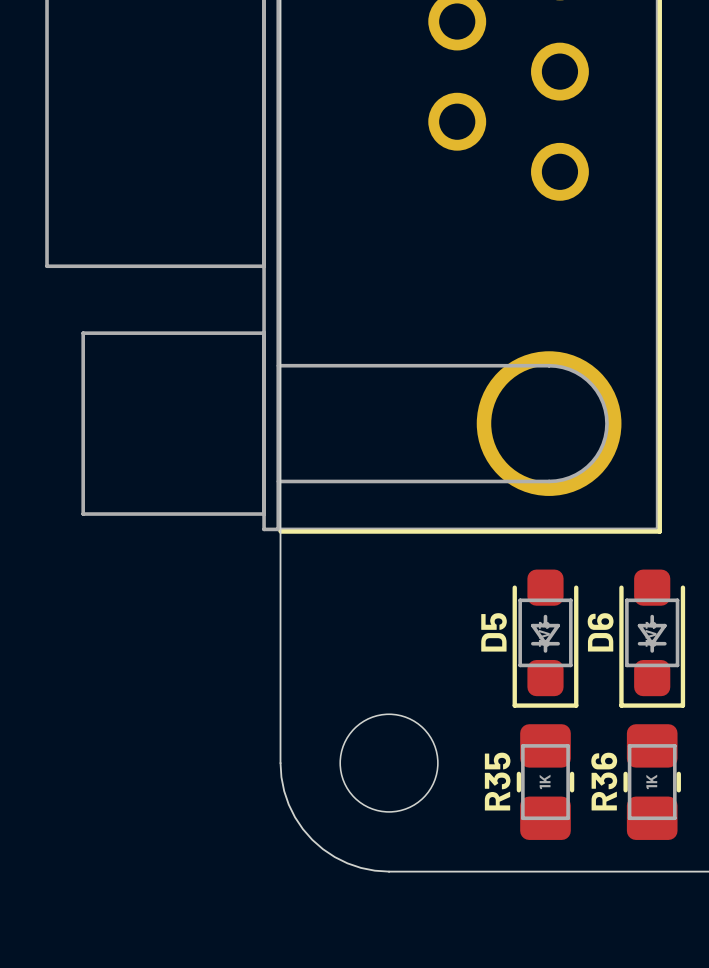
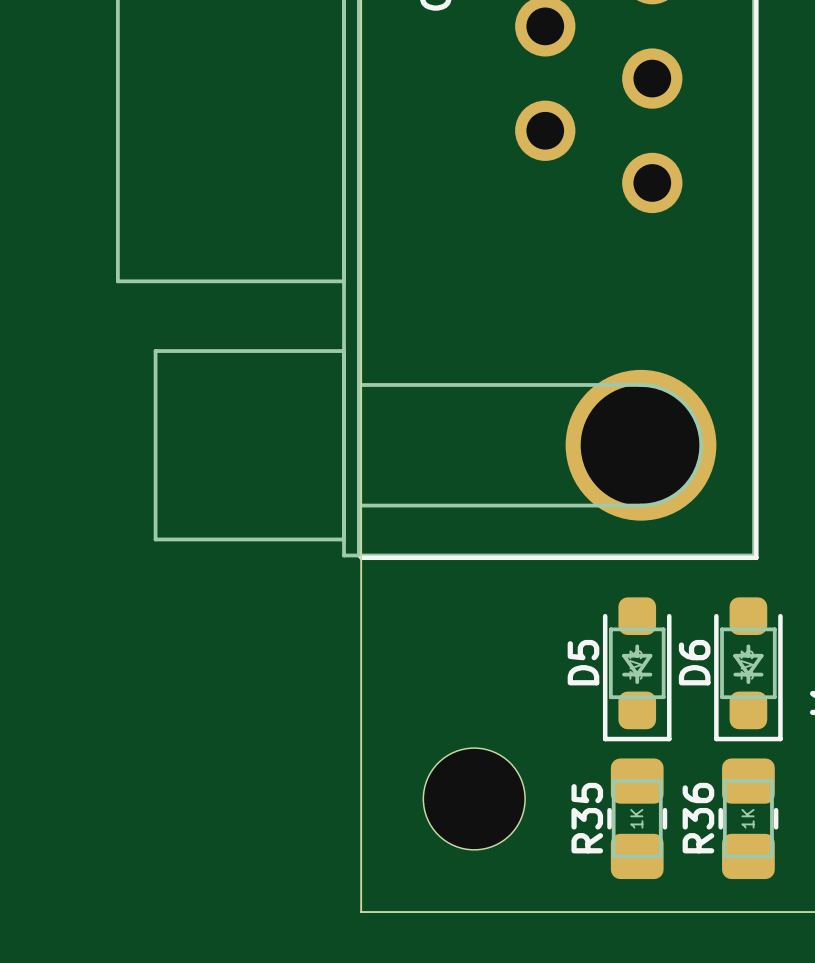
board edge: (280, 763) (284, 791) (288, 804) (302, 829) (312, 839) (334, 857) (347, 863) (360, 867) (389, 871) -> (361, 798) (361, 912) (474, 912)

